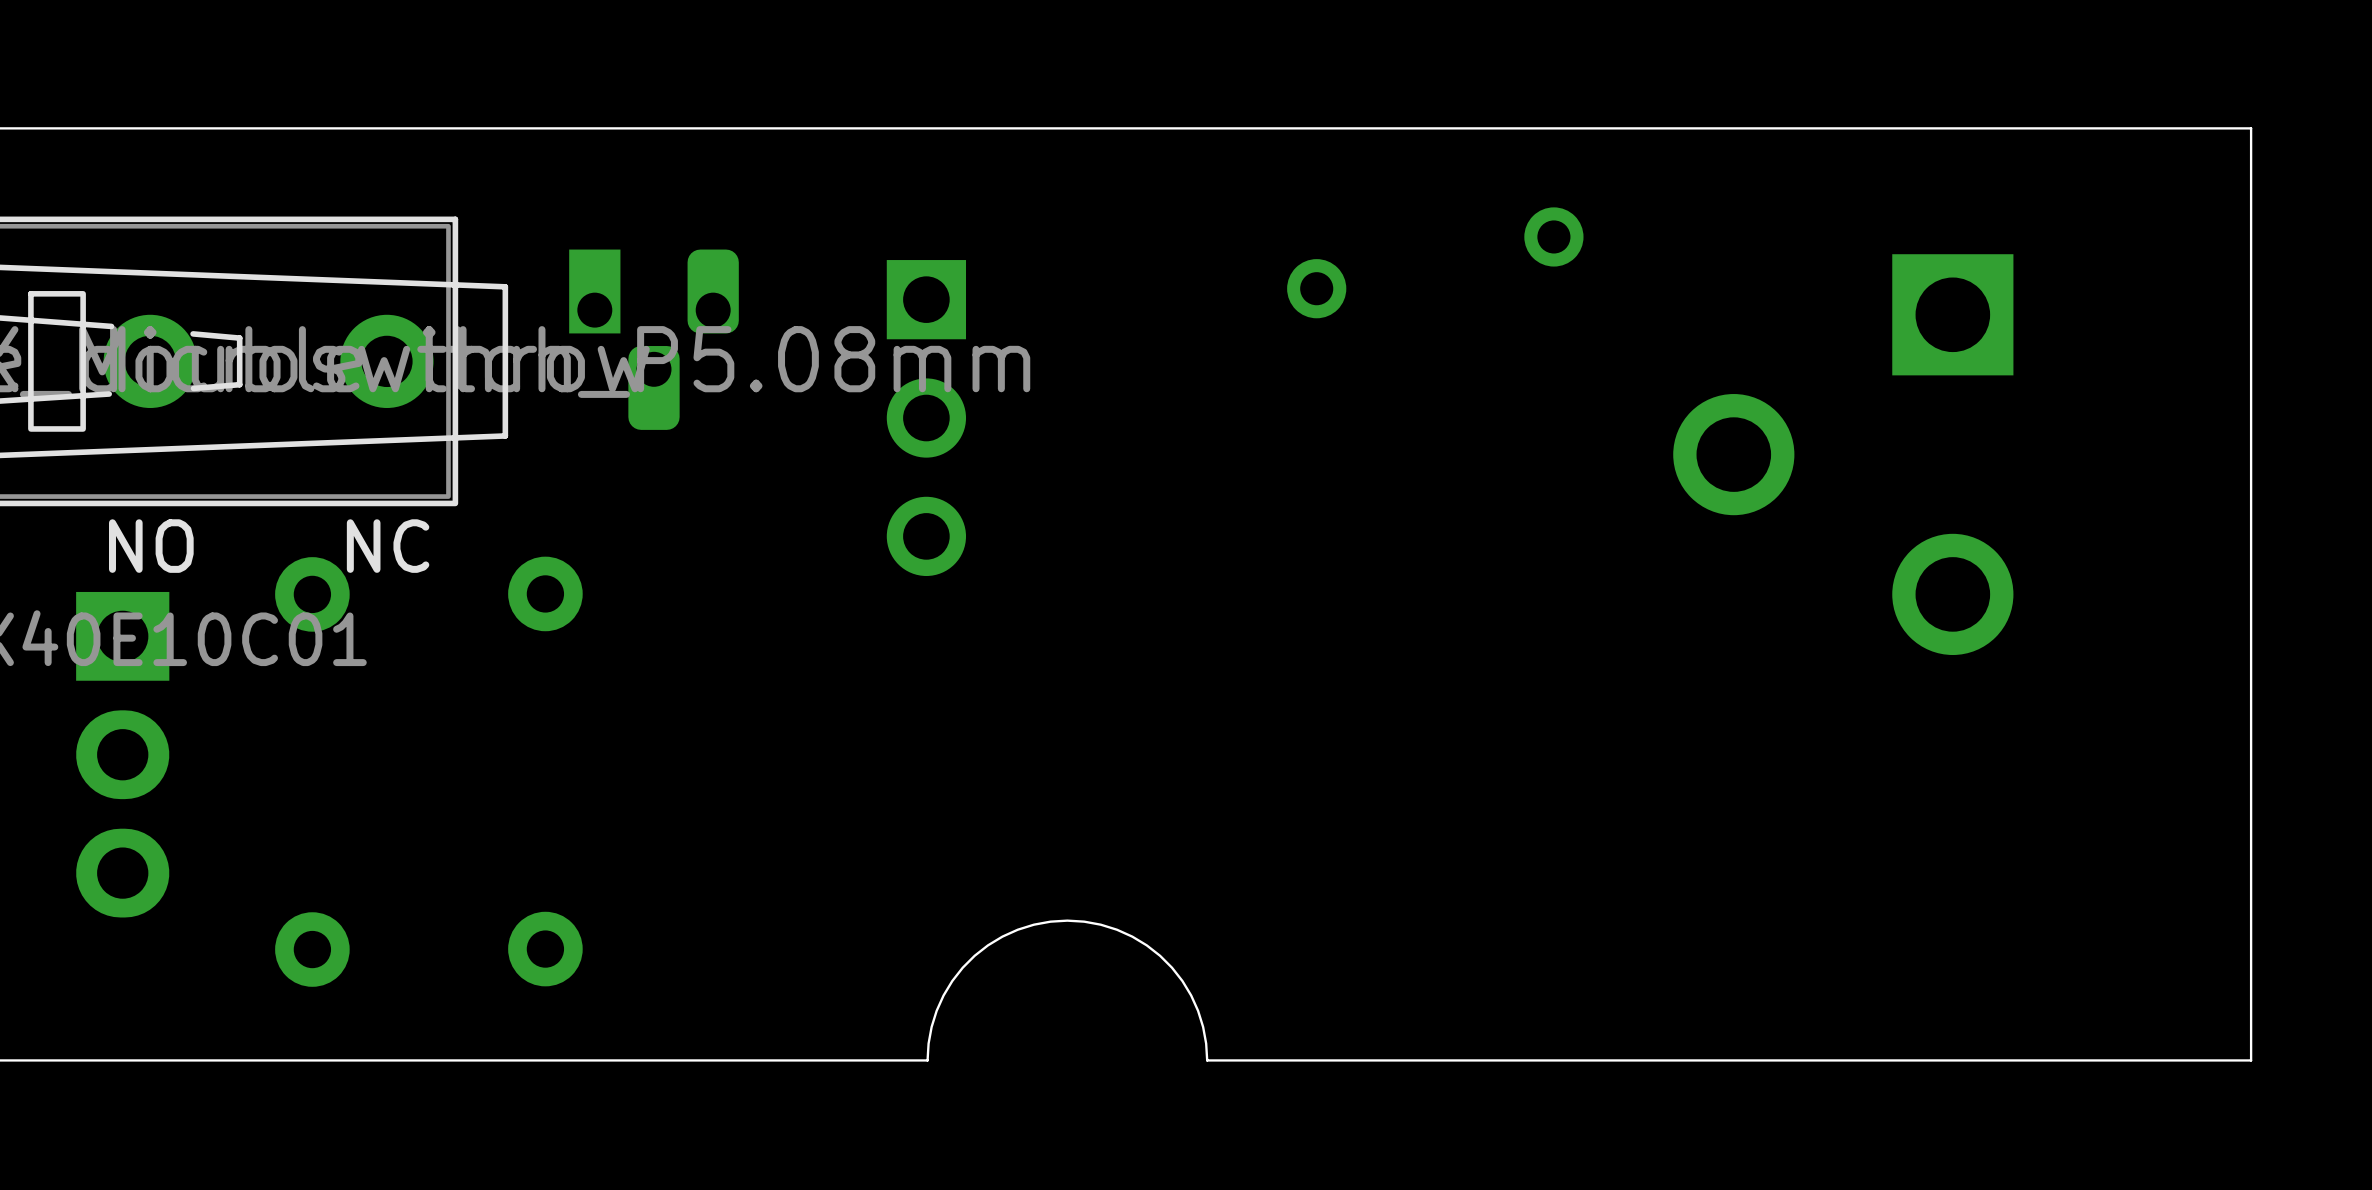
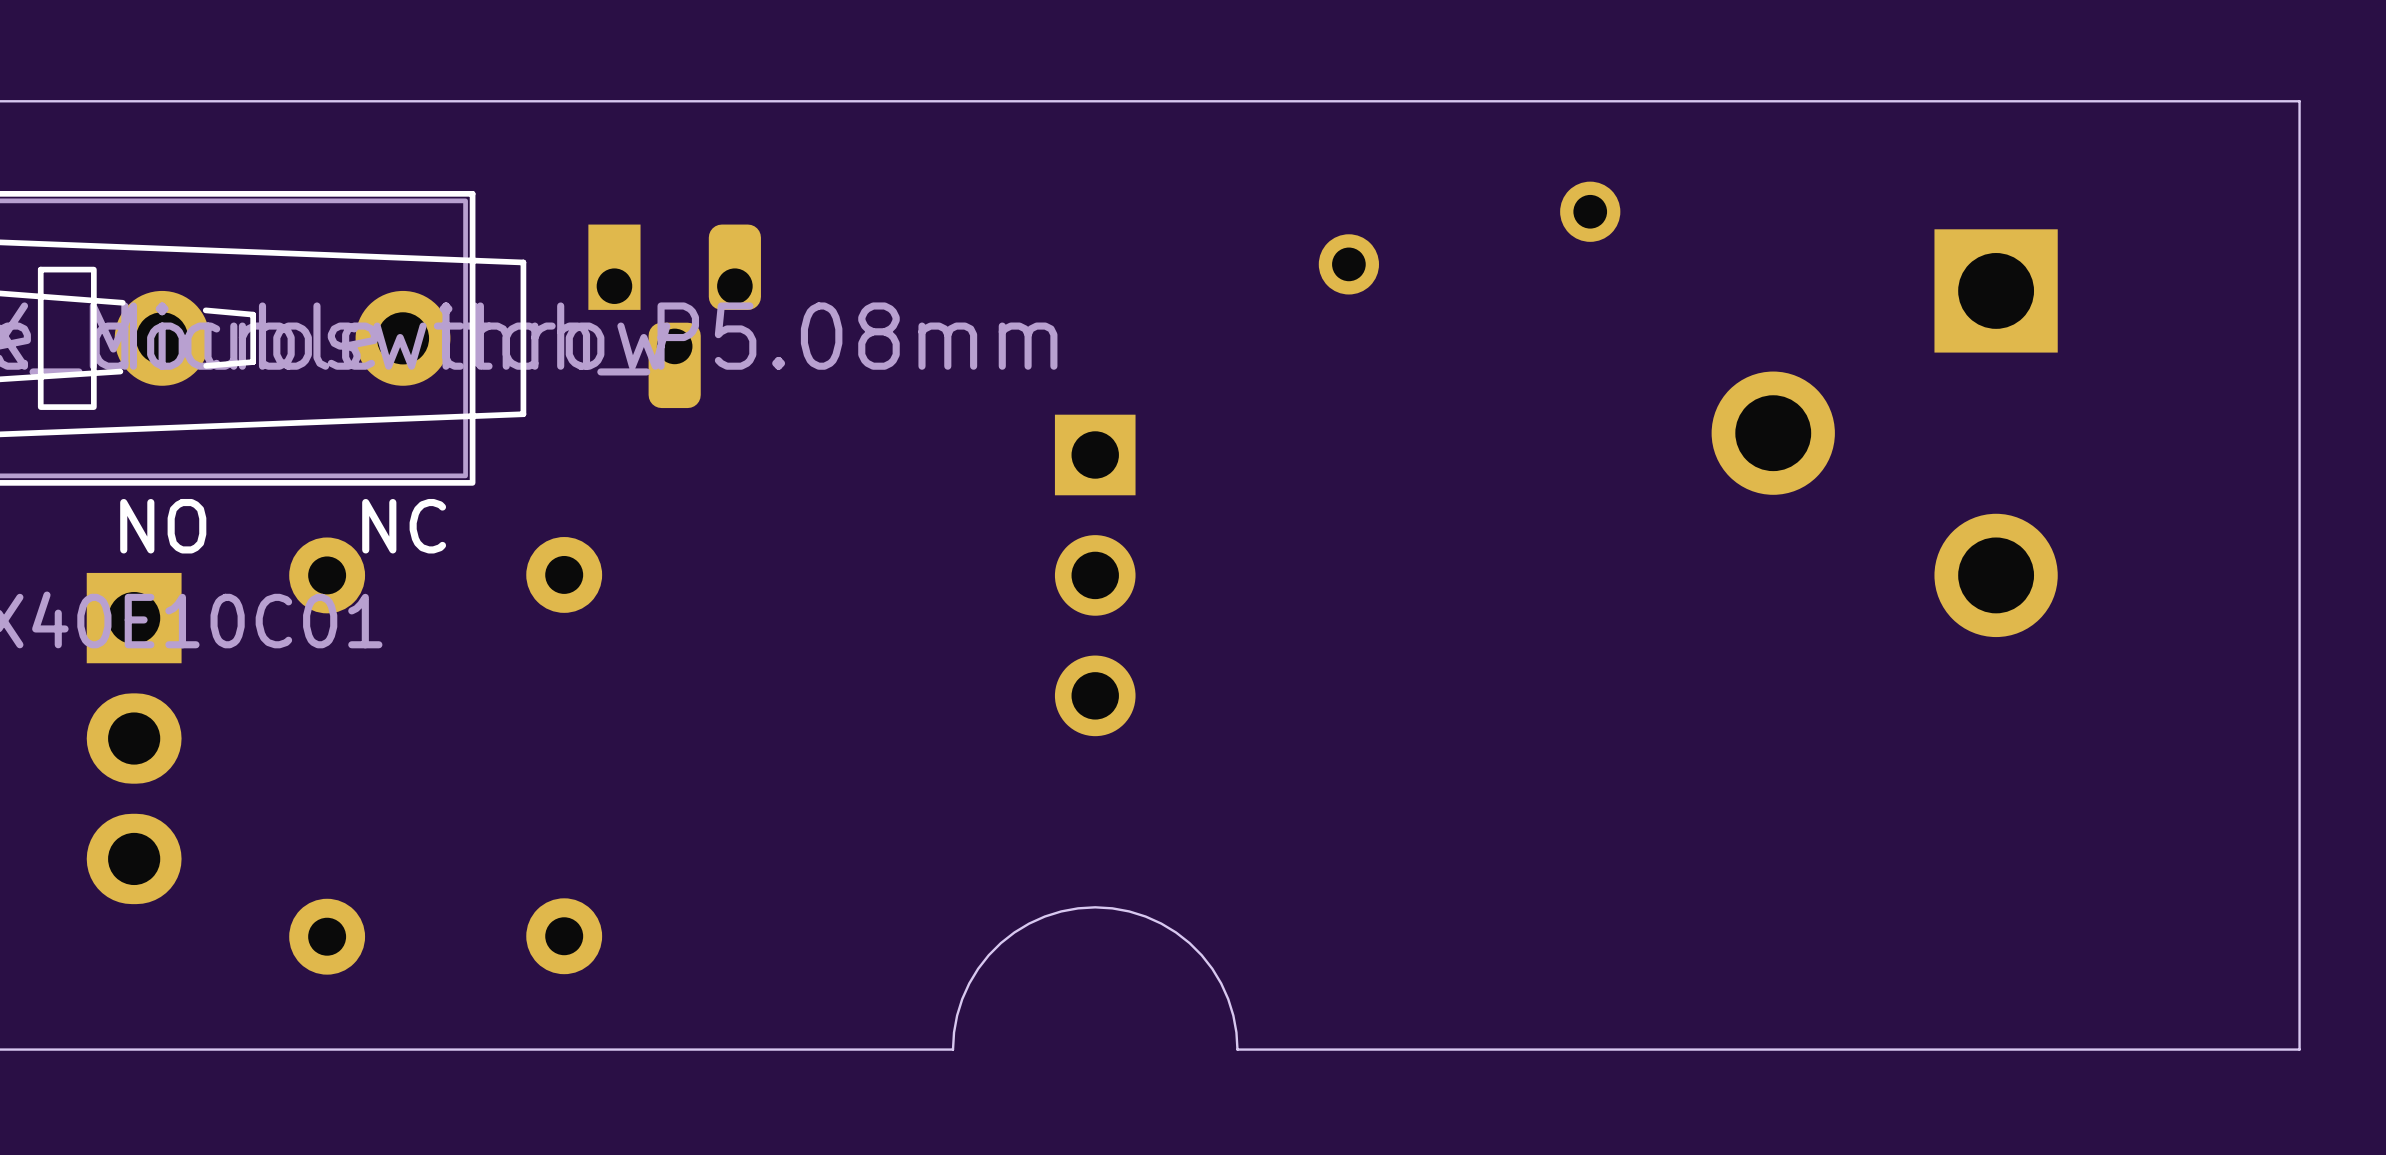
part position: (926, 418) -> (1095, 575)

